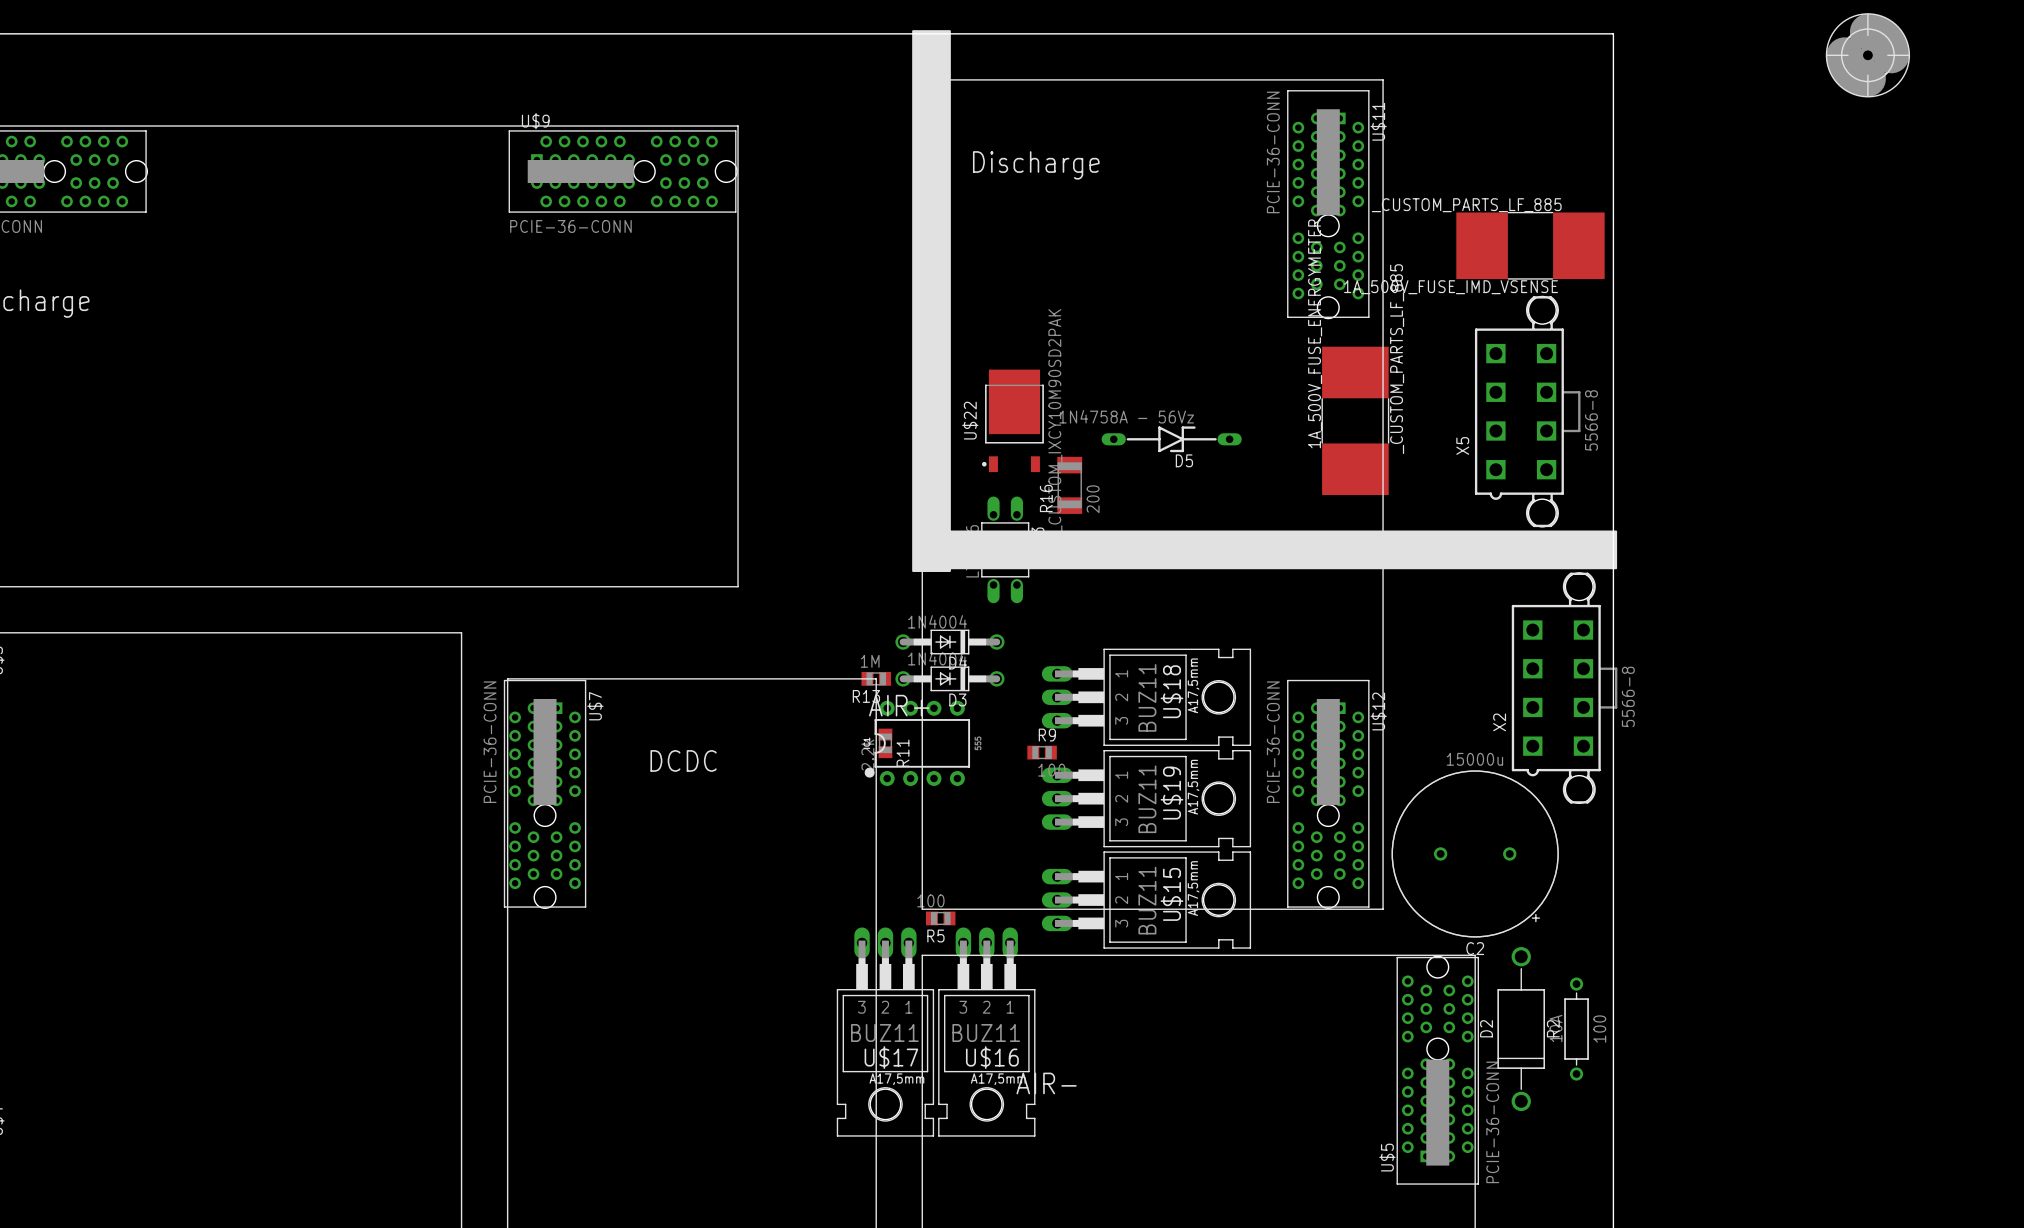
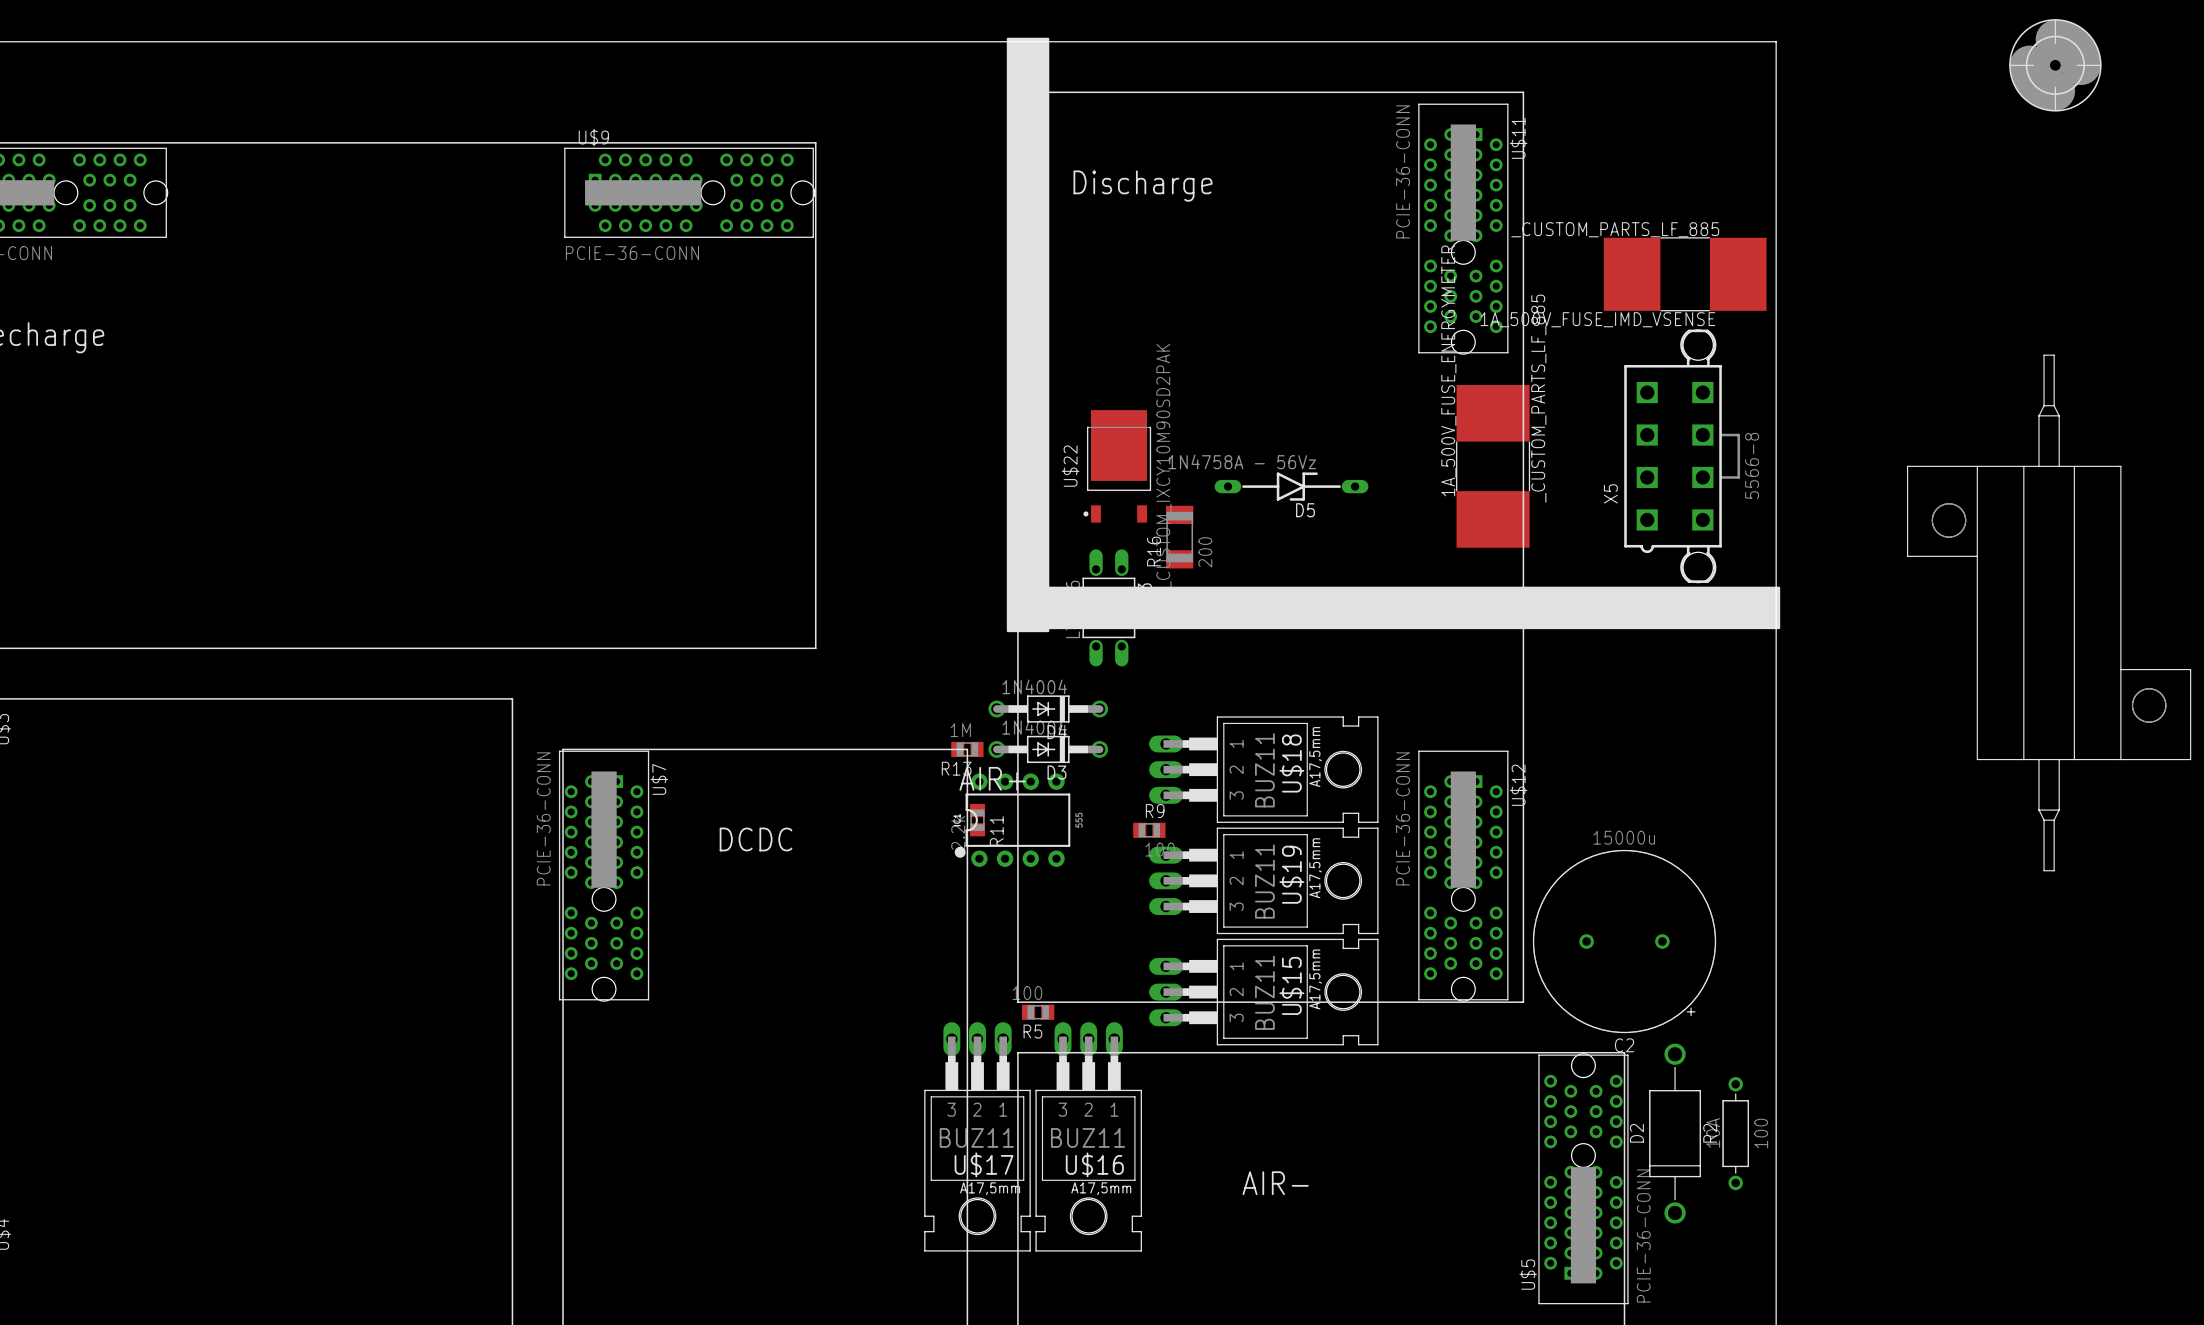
part: none -> (2049, 612)
X2: 5566-8 (1564, 688) -> none
text position: AIR- (1046, 1083) -> AIR- (1275, 1183)

